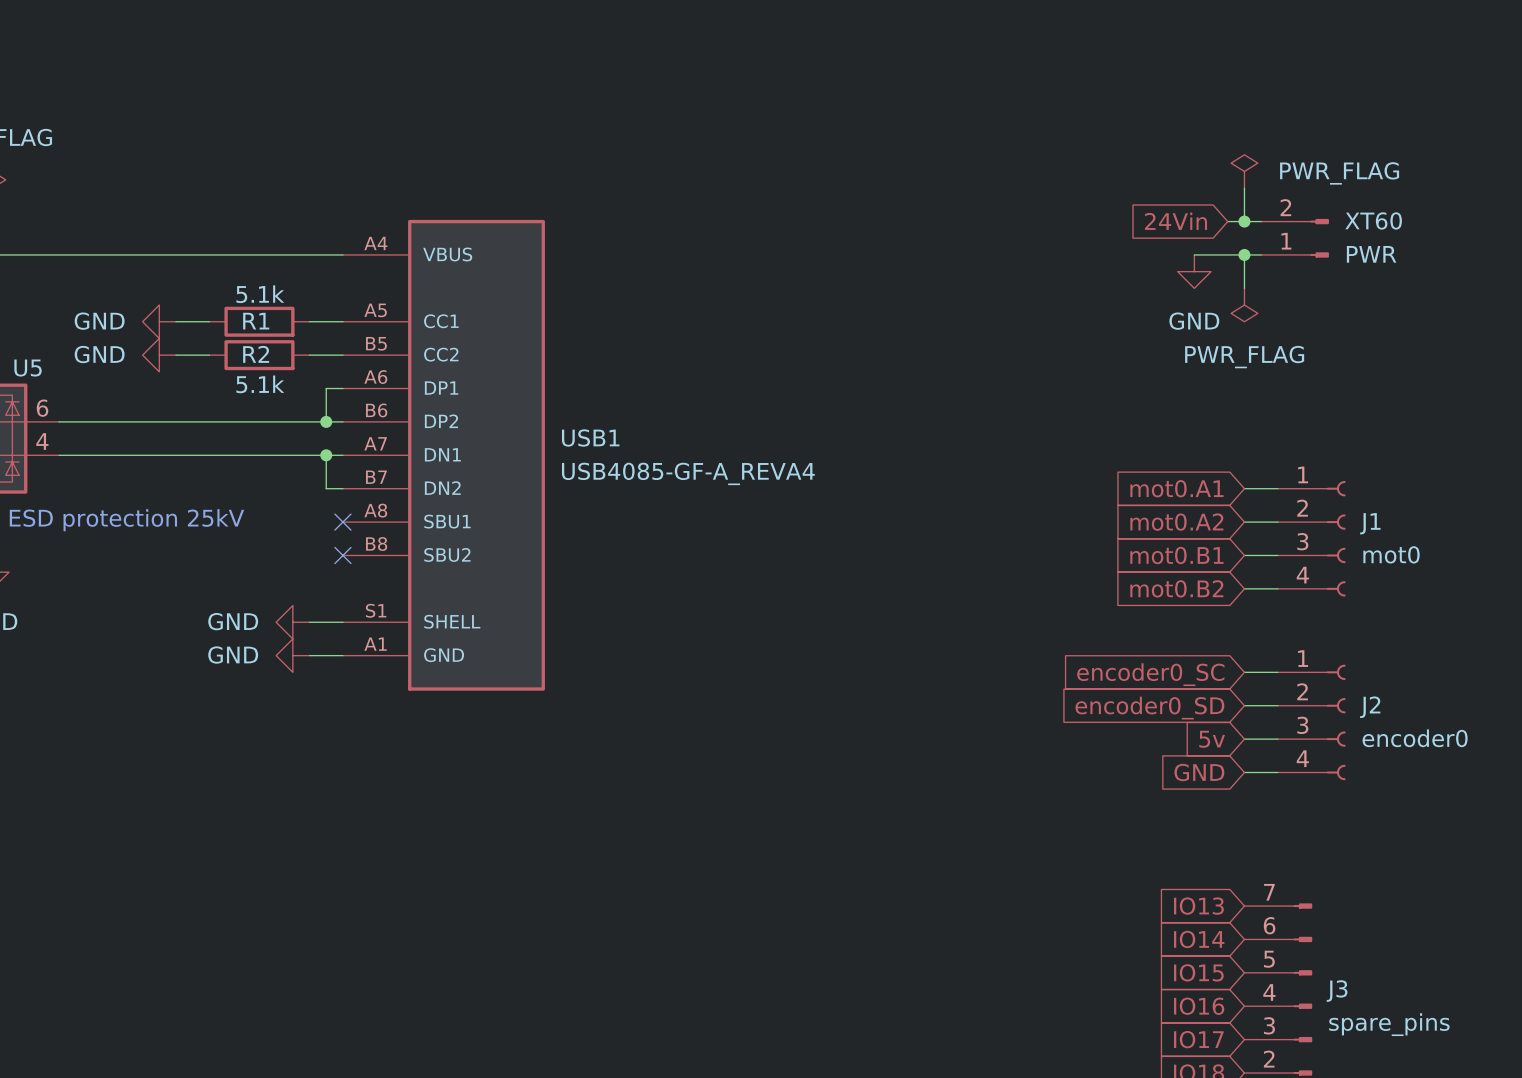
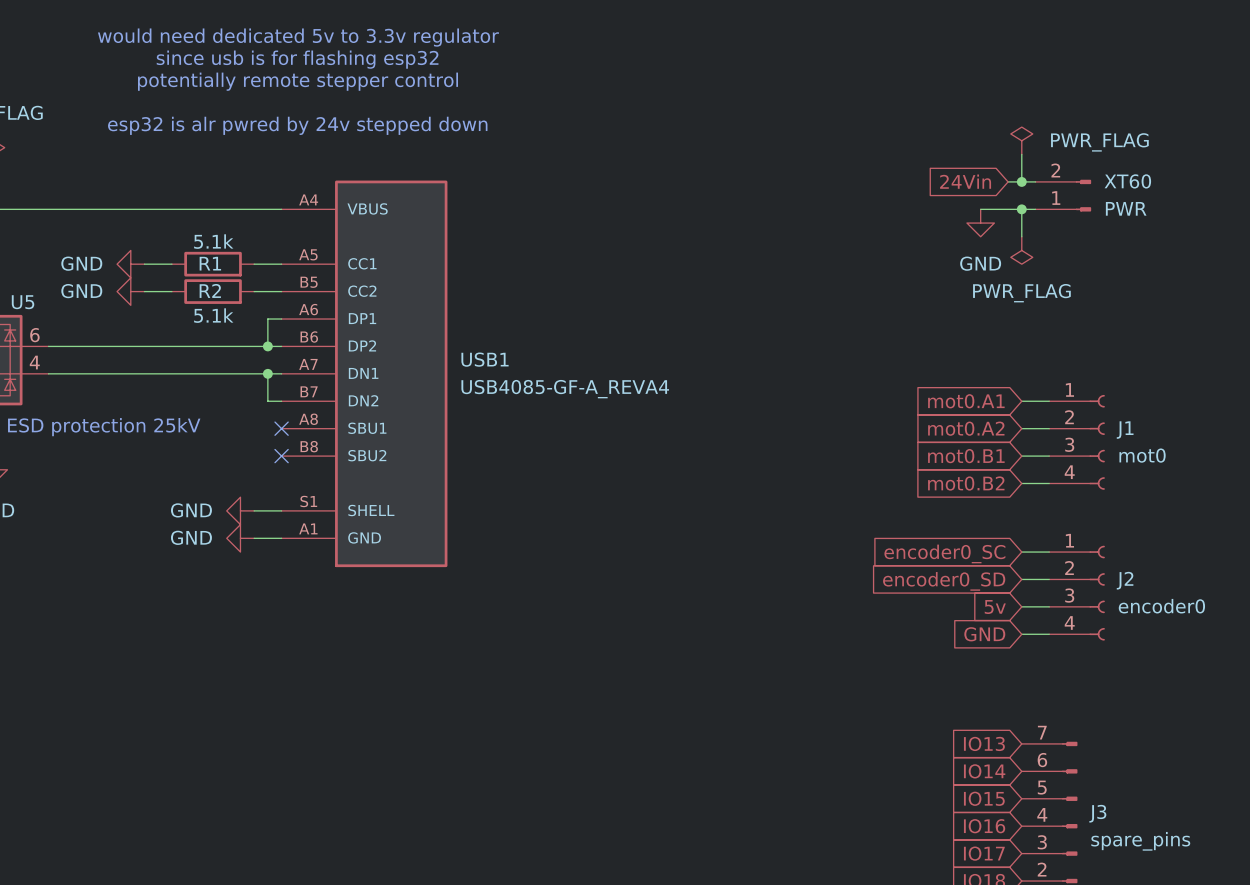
text: none -> would need dedicated 5v to 3.3v regulator (298, 37)
text: none -> since usb is for flashing esp32 (297, 59)
text: none -> potentially remote stepper control (298, 81)
text: none -> esp32 is alr pwred by 24v stepped down (297, 125)

